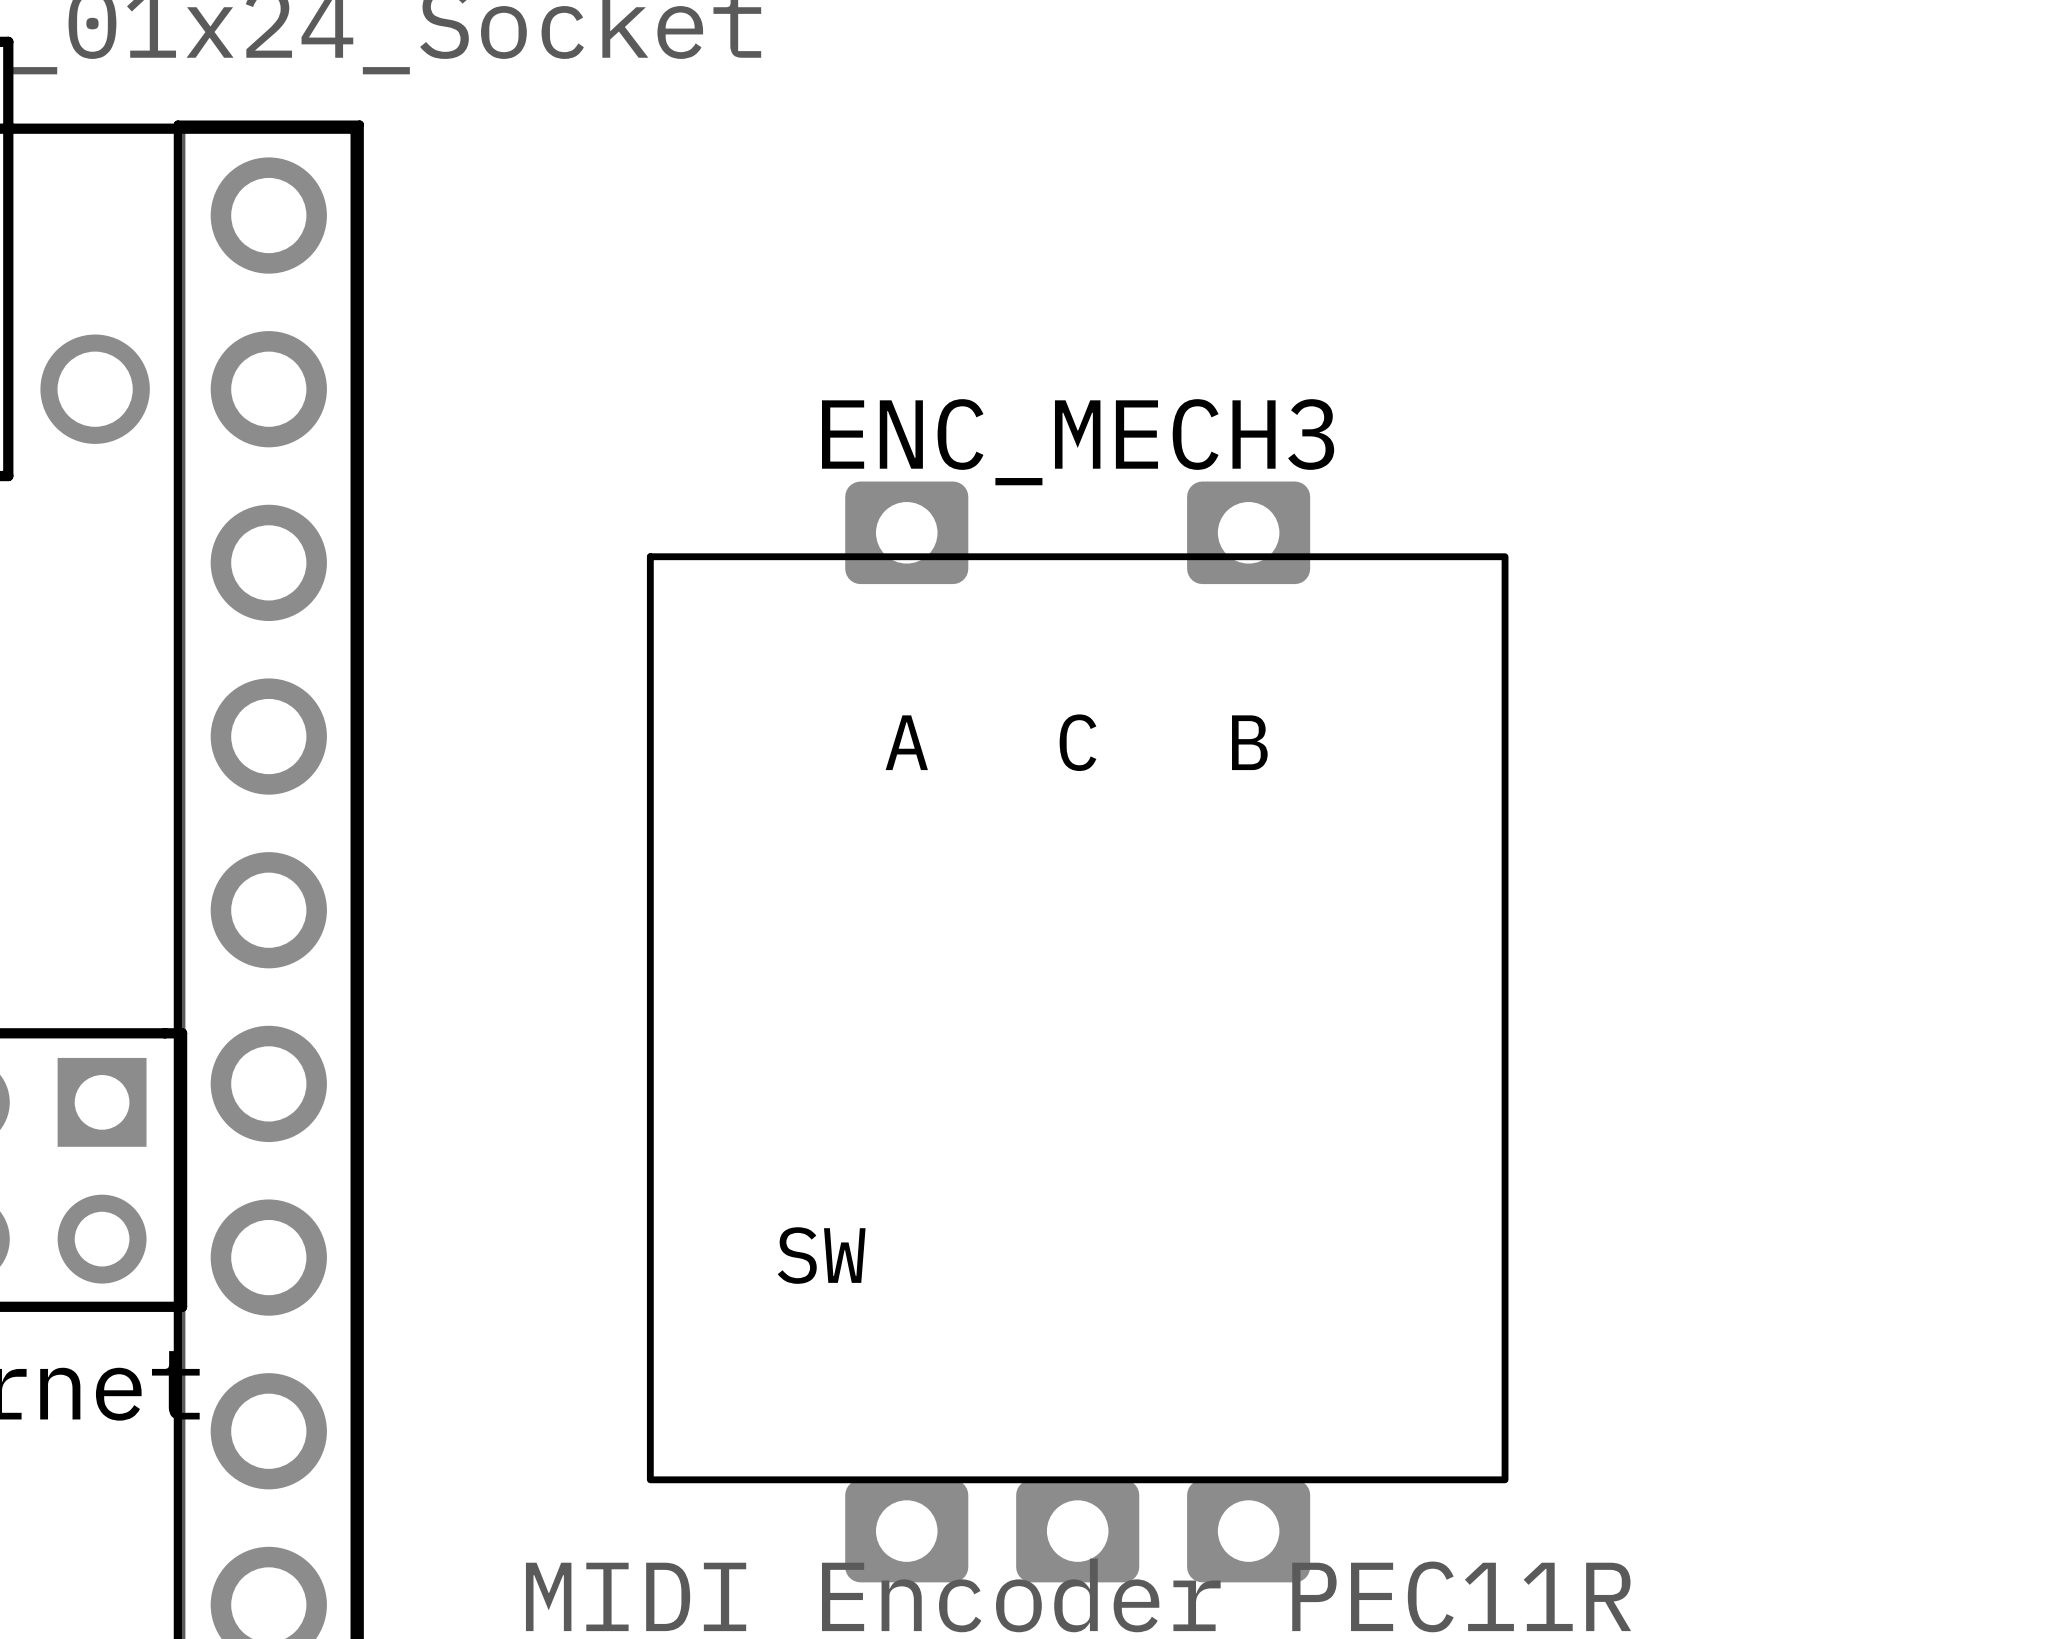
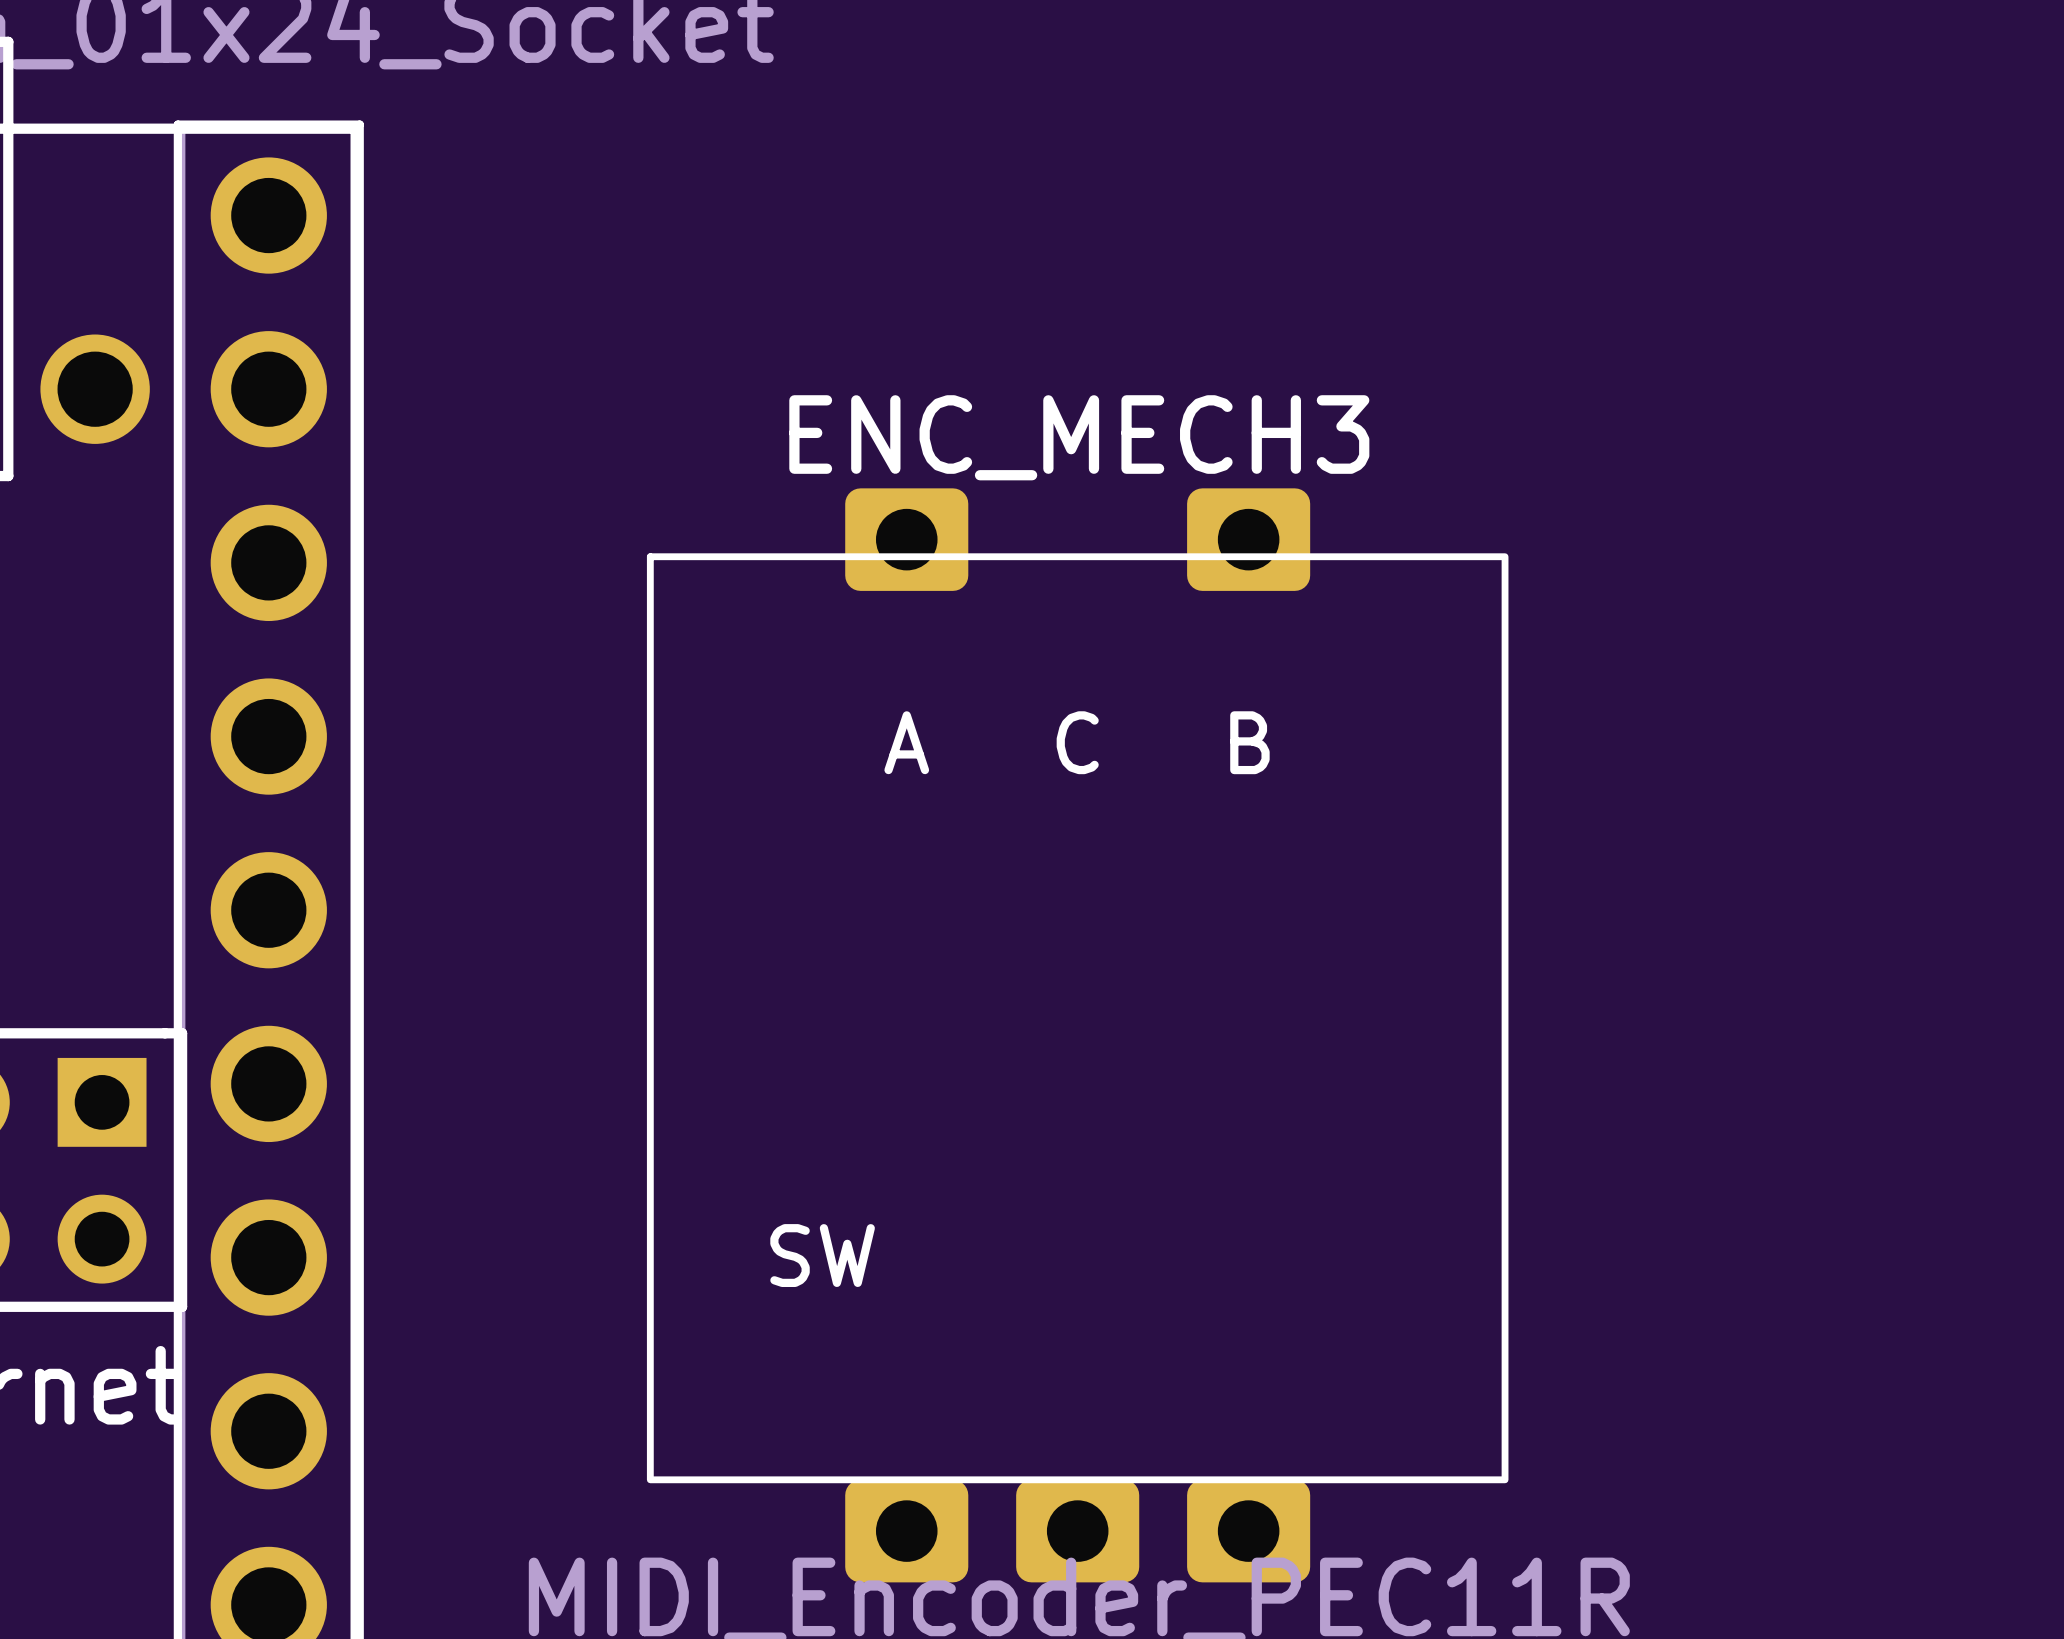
ENC_MECH3 footprint: [646, 481, 1509, 1583] -> [646, 488, 1509, 1583]

